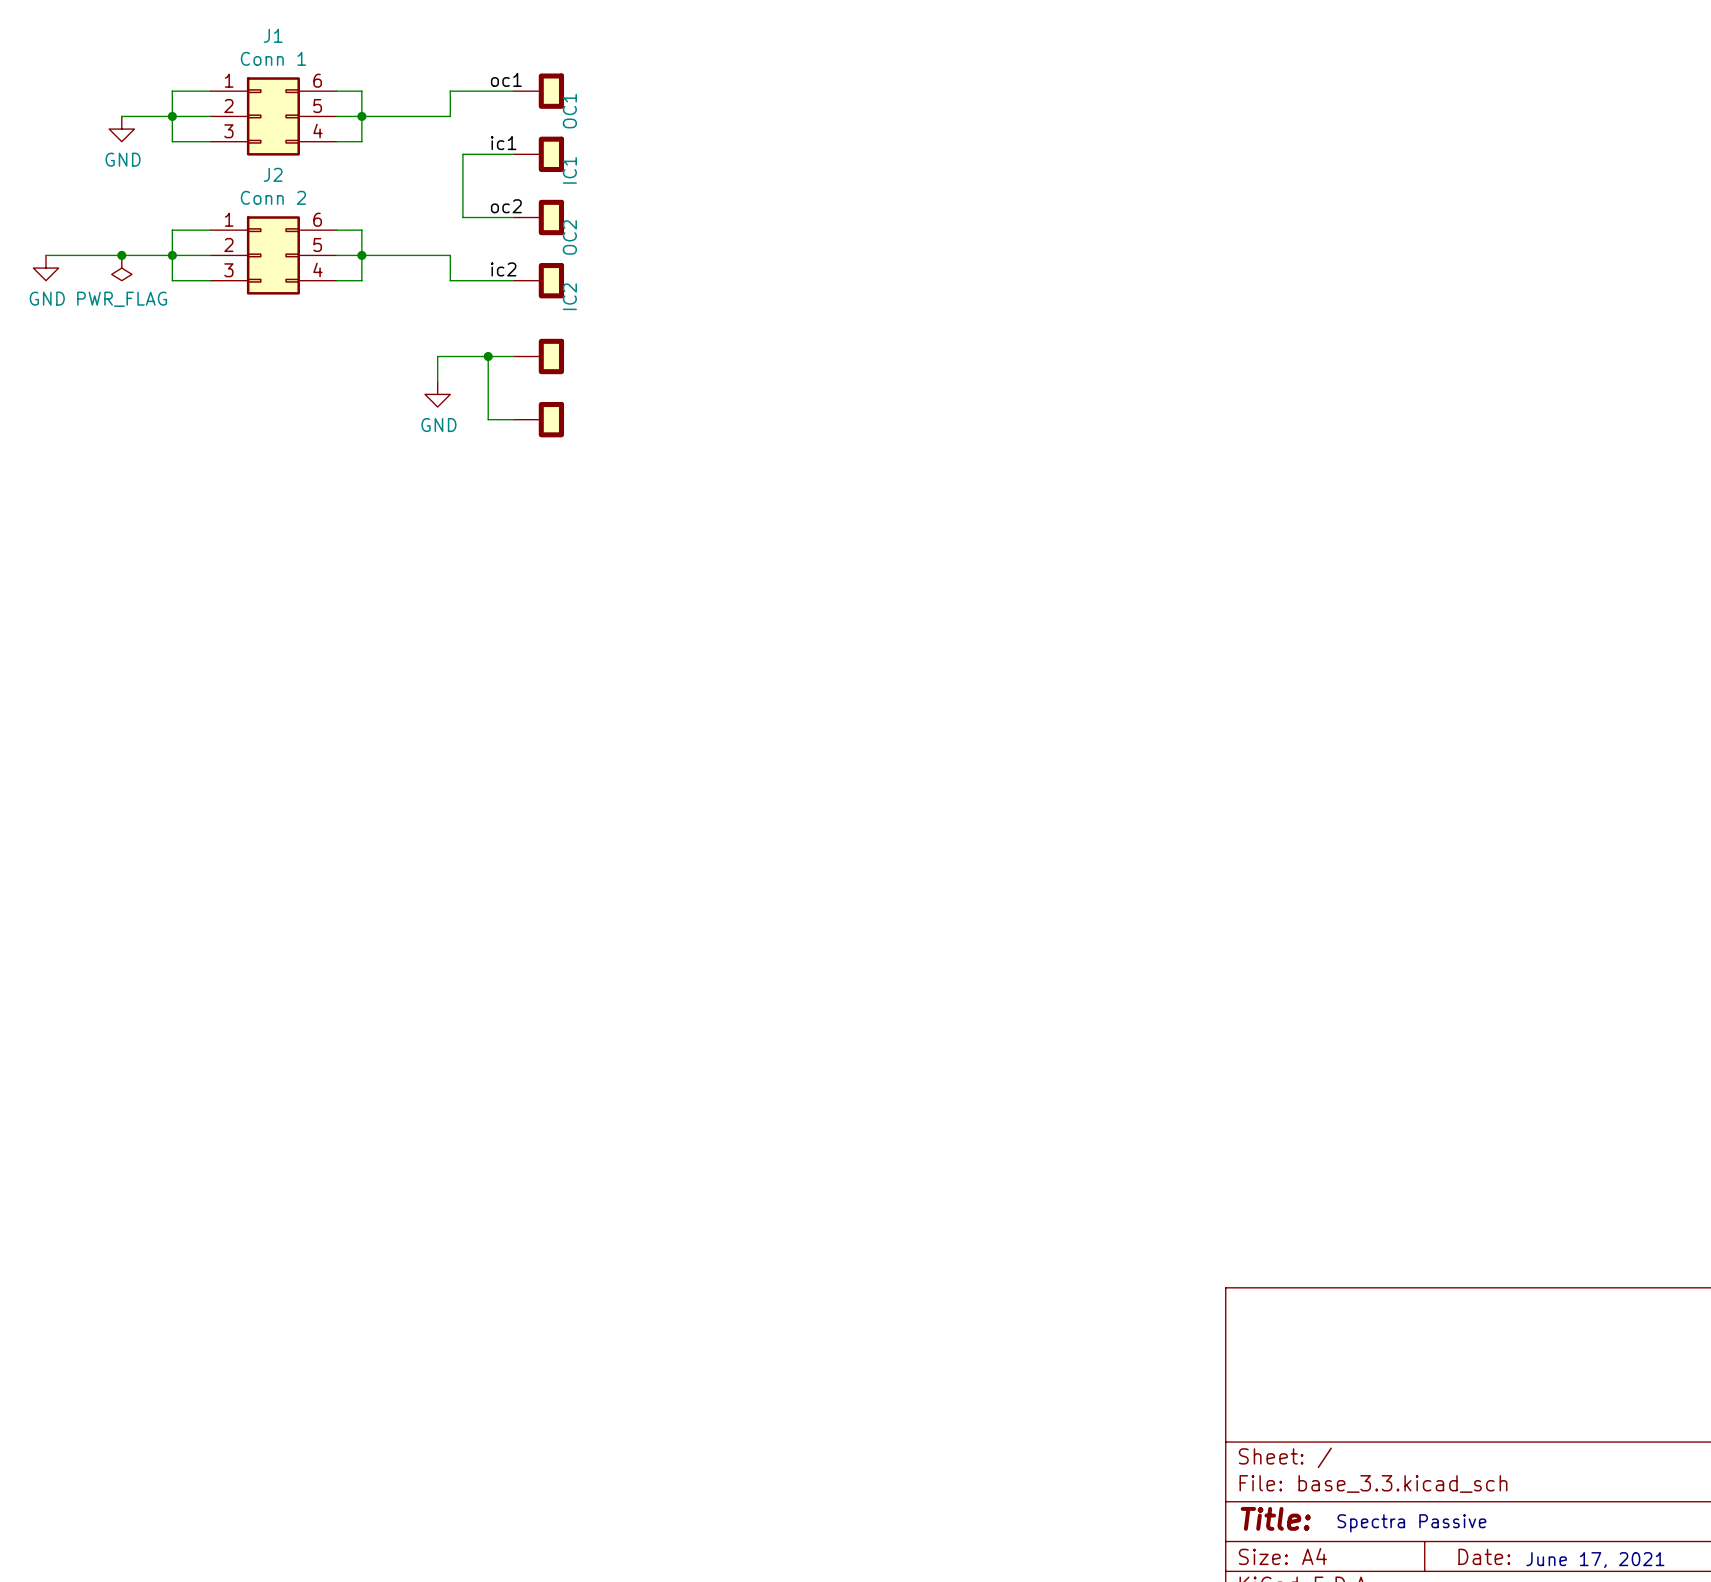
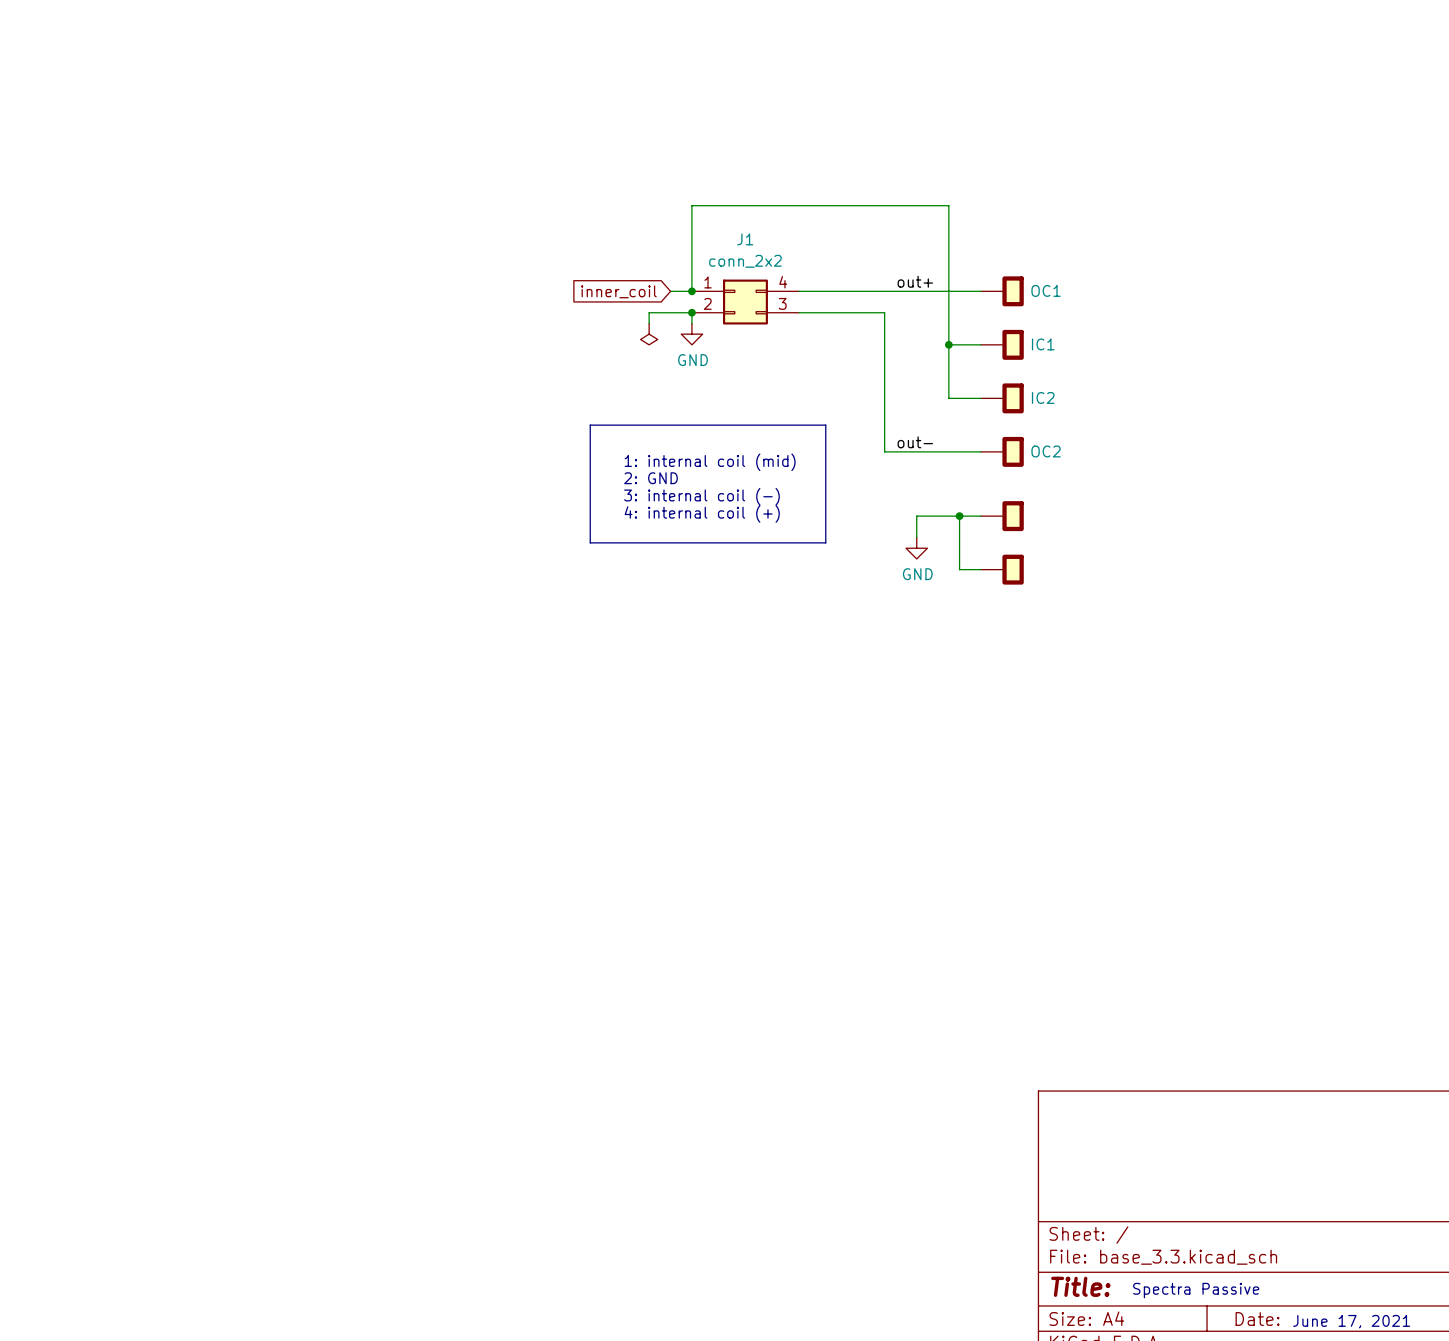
J1 value: Conn 1 (273, 58) -> conn_2x2 (745, 261)
J1 symbol: [210, 77, 337, 156] -> [691, 279, 799, 325]
label: oc1 (506, 79) -> none
wire: (210, 91) (172, 91) (172, 141) (210, 141) -> none
wire: (336, 91) (361, 91) (361, 141) (336, 141) -> none
wire: (513, 91) (450, 91) (450, 116) (336, 116) -> none
OC1 position: (538, 91) -> (1002, 291)
OC1 name rotation: 0° (569, 111) -> 90° clockwise (1046, 290)
wire: (121, 116) (210, 116) -> none
junction: (172, 116) -> none
junction: (361, 116) -> none
power symbol: GND (121, 129) -> none
label: ic1 (503, 143) -> none
wire: (513, 154) (462, 154) (462, 217) (513, 217) -> none
IC1 position: (538, 154) -> (1002, 344)
IC1 name rotation: 0° (569, 170) -> 90° clockwise (1043, 344)
label: oc2 (506, 206) -> none
OC2 position: (538, 217) -> (1002, 451)
wire: (210, 230) (172, 230) (172, 280) (210, 280) -> none
wire: (336, 230) (361, 230) (361, 280) (336, 280) -> none
OC2 name rotation: 0° (569, 237) -> 90° clockwise (1046, 451)
wire: (45, 255) (210, 255) -> none
junction: (121, 255) -> none
junction: (172, 255) -> none
J2: Conn 2 (273, 255) -> none
wire: (336, 255) (450, 255) (450, 280) (513, 280) -> none
junction: (361, 255) -> none
power symbol: GND (45, 268) -> none
power symbol: PWR_FLAG (121, 268) -> none
label: ic2 (503, 269) -> none
IC2 position: (538, 280) -> (1002, 398)
IC2 name rotation: 0° (569, 296) -> 90° clockwise (1043, 397)
label: none -> out+ (915, 281)
wire: none -> (670, 291) (691, 291) (691, 205) (948, 205) (948, 398) (980, 398)
junction: none -> (691, 291)
wire: none -> (798, 291) (980, 291)
global label: none -> inner_coil (618, 291)
wire: (488, 356) (488, 419) (513, 419) -> none
junction: (488, 356) -> none
wire: (513, 356) (437, 356) (437, 381) -> none
part: (538, 356) -> none
junction: none -> (691, 312)
wire: none -> (798, 312) (884, 312) (884, 451) (980, 451)
wire: none -> (649, 323) (649, 312) (691, 312) (691, 323)
power symbol: GND (437, 394) -> none
power symbol: none -> (649, 334)
power symbol: none -> GND (691, 334)
wire: none -> (948, 344) (980, 344)
junction: none -> (948, 344)
part: (538, 419) -> none
line: none -> (590, 425) (590, 542) (825, 542) (825, 425) (590, 425)
label: none -> out- (915, 442)
text: none -> 1: internal coil (mid) (710, 462)
text: none -> 2: GND (650, 478)
text: none -> 3: internal coil (-) (701, 496)
text: none -> 4: internal coil (+) (702, 513)
wire: none -> (959, 516) (959, 569) (980, 569)
junction: none -> (959, 516)
wire: none -> (980, 516) (916, 516) (916, 537)
part: none -> (1002, 516)
power symbol: none -> GND (916, 548)
part: none -> (1002, 569)

